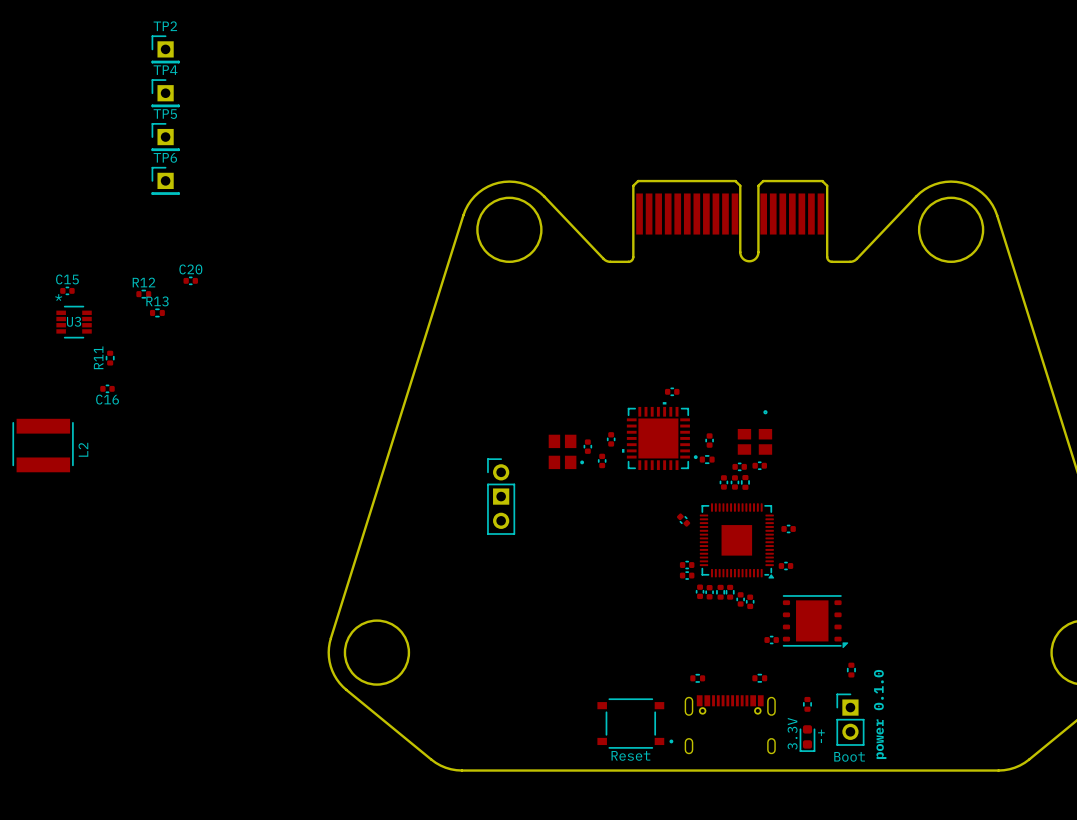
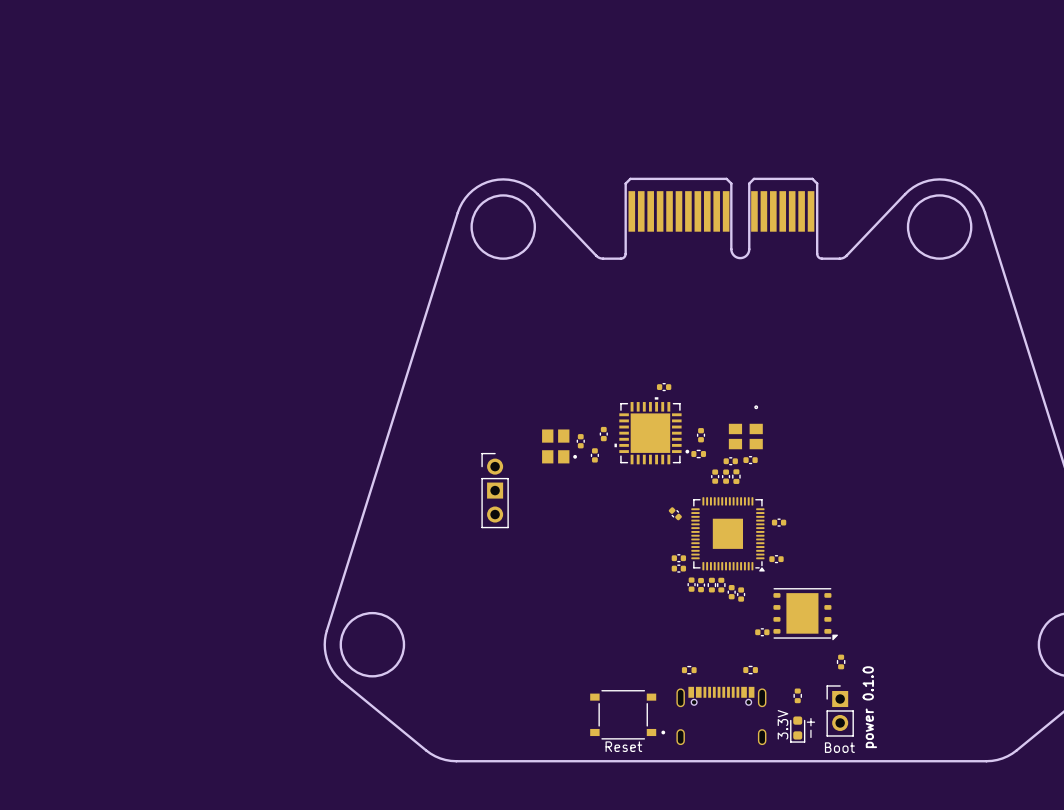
TP2: (165, 49) -> none
TP4: (165, 93) -> none
TP5: (165, 137) -> none
TP6: (165, 180) -> none
C20: (190, 280) -> none
C15: (67, 290) -> none
R12: (143, 294) -> none
R13: (157, 312) -> none
U3: (74, 322) -> none
R11: (110, 358) -> none
C16: (107, 388) -> none
L2: (43, 445) -> none

